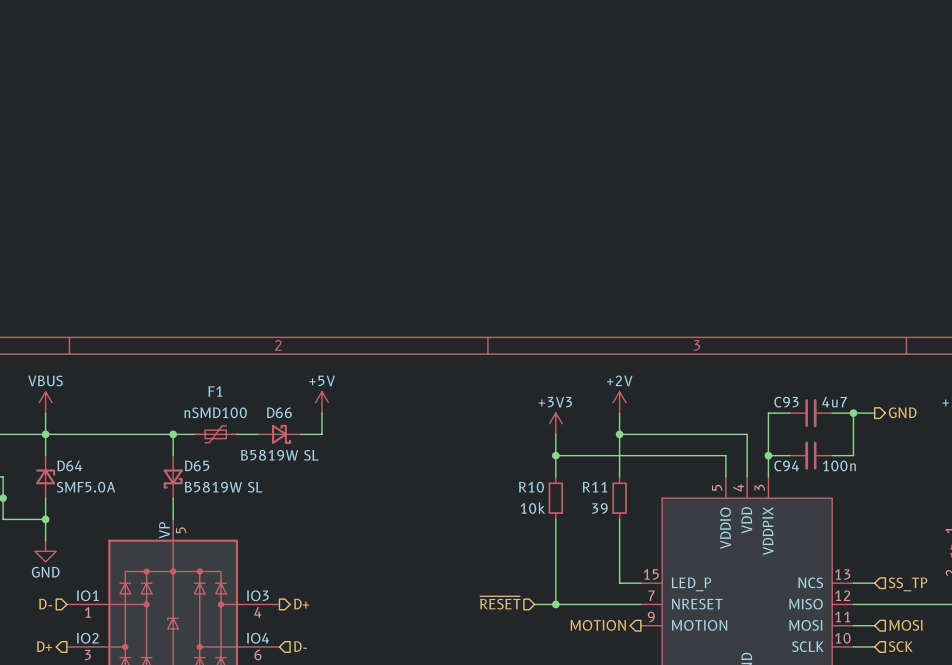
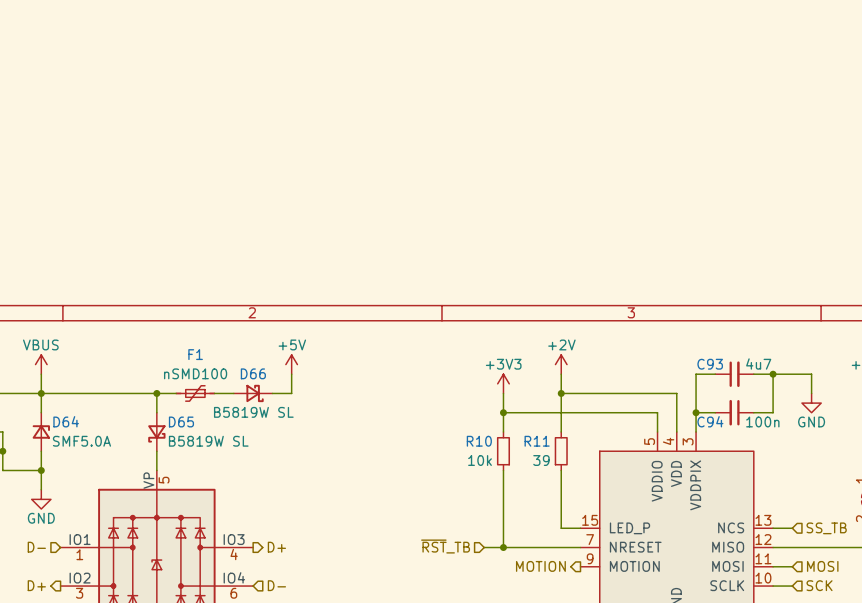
hierarchical label: GND (902, 412) -> none
wire: none -> (792, 374) (811, 374) (811, 393)
power symbol: none -> GND (811, 403)
hierarchical label: SS_TP (908, 584) -> SS_TB (826, 528)
hierarchical label: ~{RESET} (500, 602) -> ~{RST}_TB (445, 546)

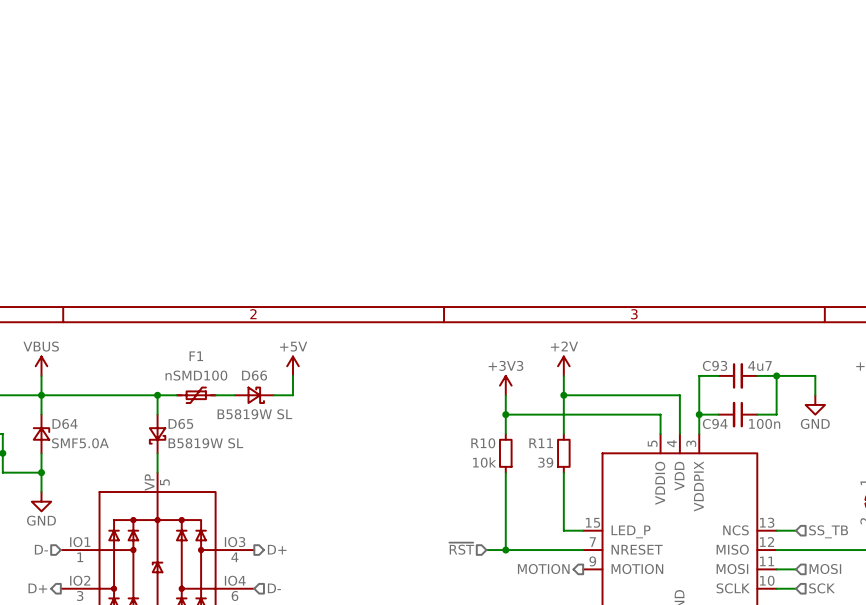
hierarchical label: ~{RST}_TB (445, 546) -> ~{RST} (461, 548)

